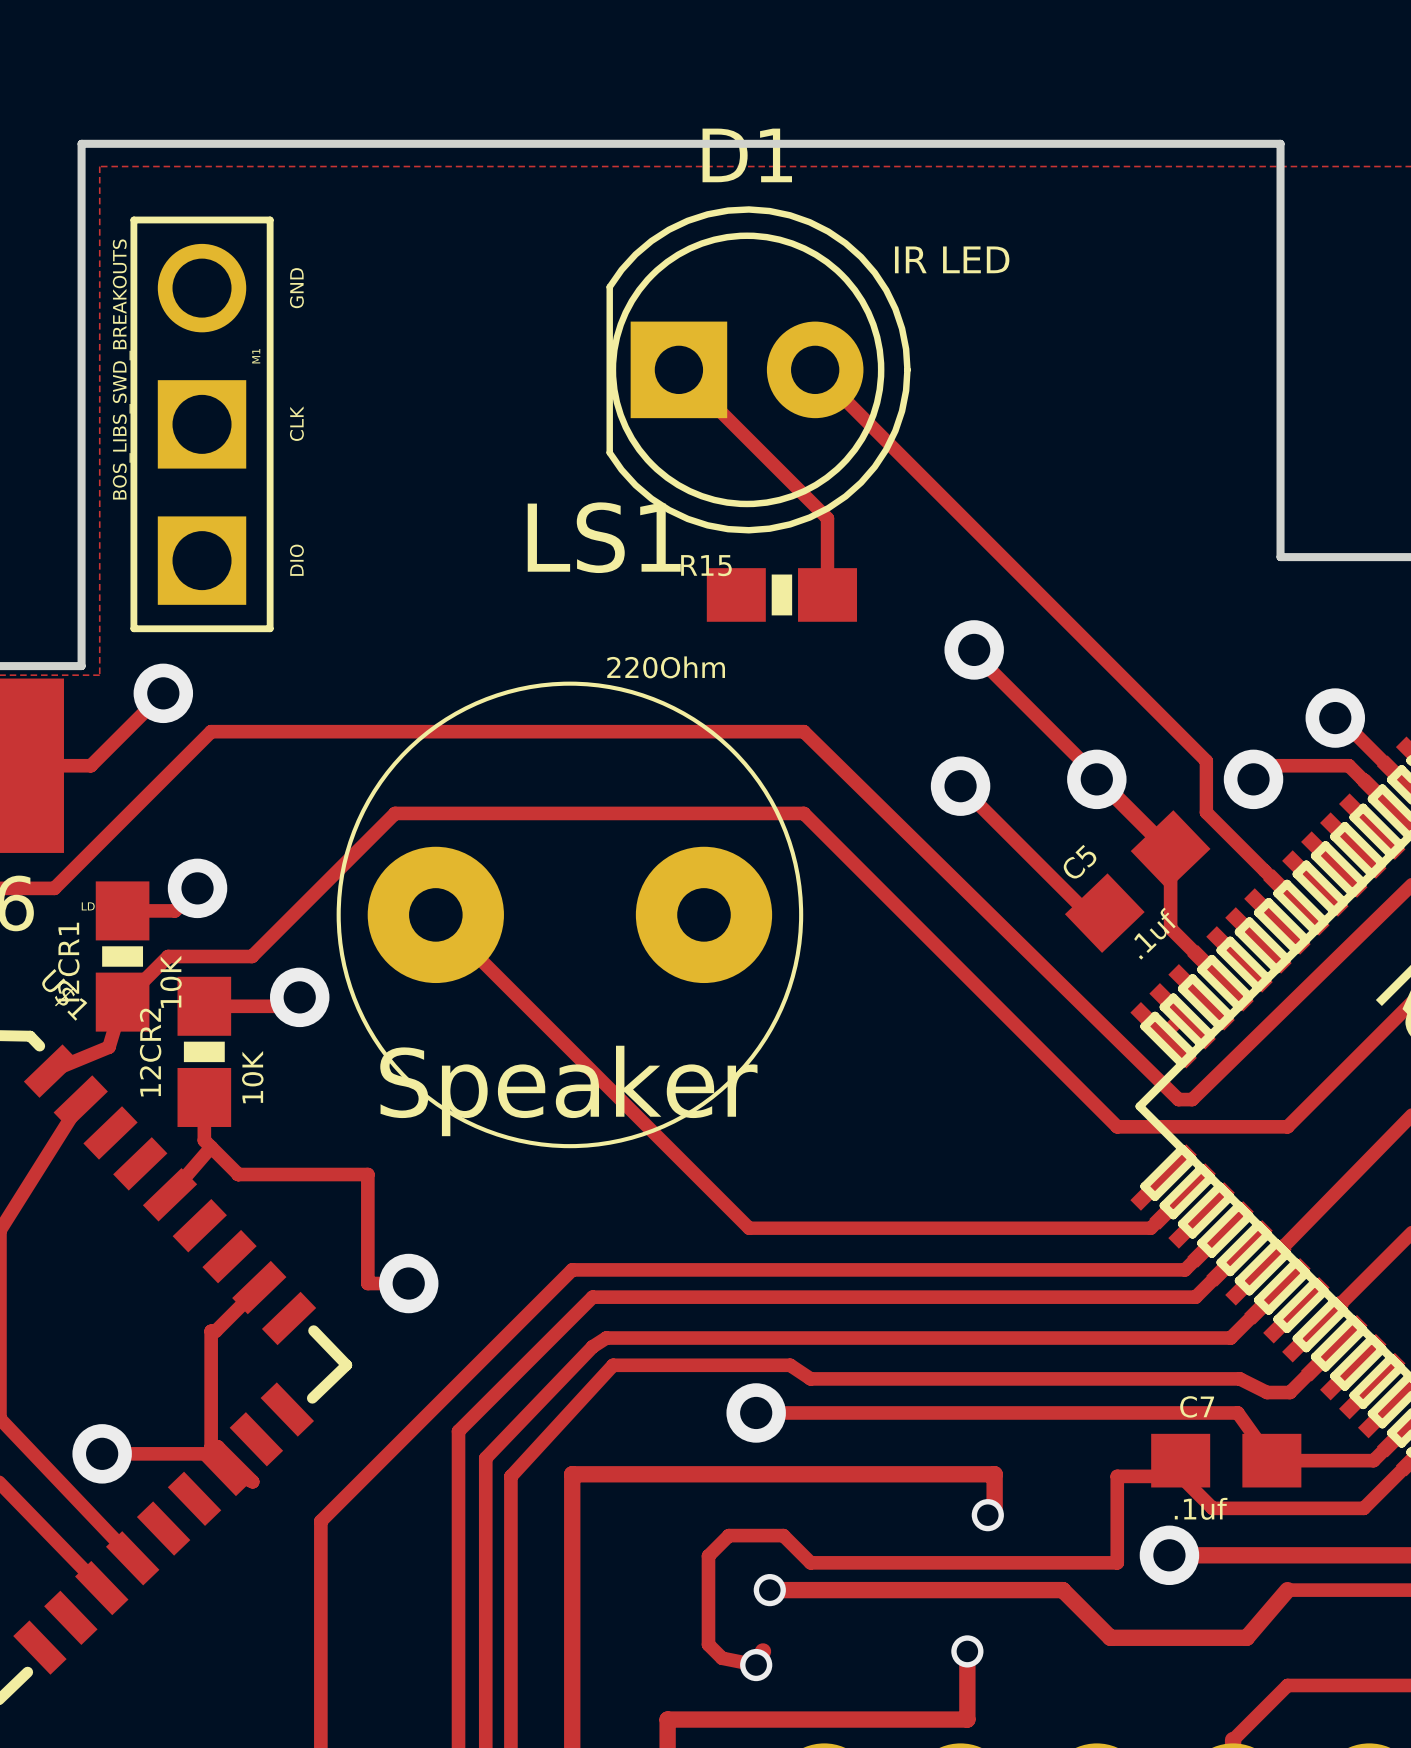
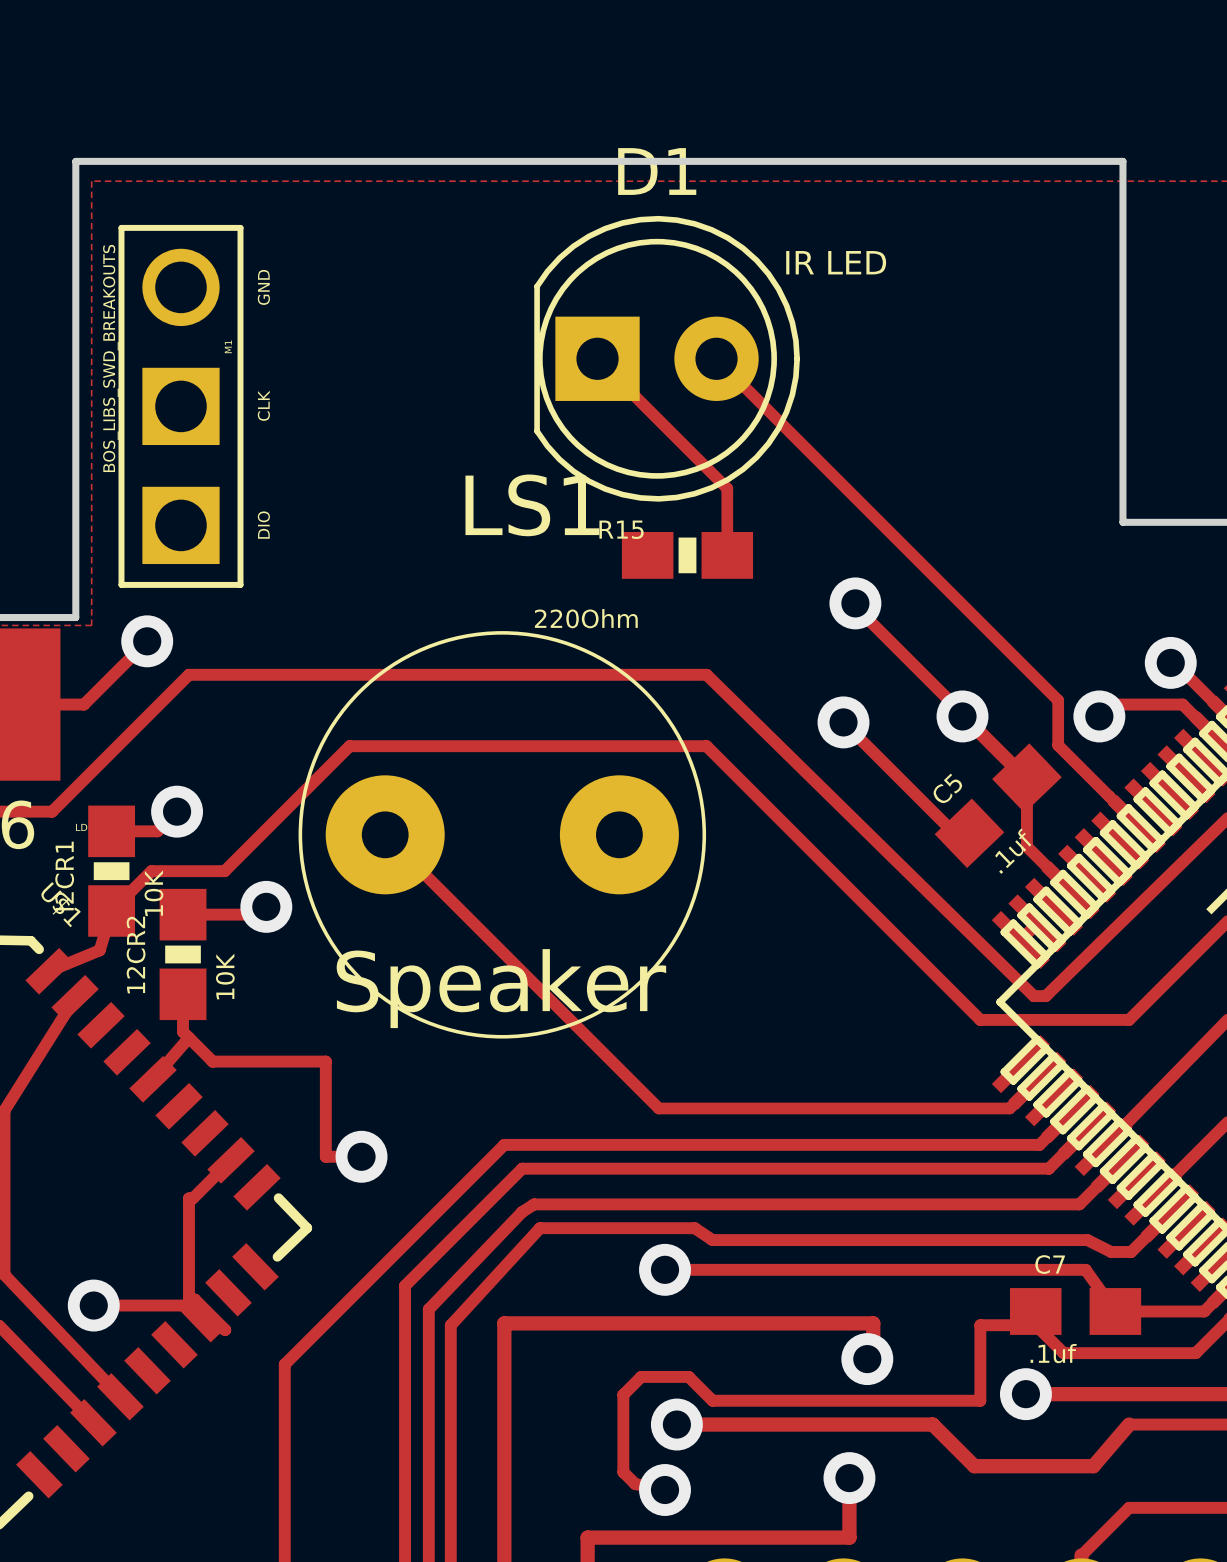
via size: [971, 1499, 1004, 1532] -> [841, 1333, 894, 1386]
via size: [753, 1574, 786, 1607] -> [650, 1398, 703, 1451]
via size: [951, 1635, 984, 1668] -> [823, 1452, 876, 1505]
via size: [740, 1648, 773, 1682] -> [639, 1464, 691, 1516]

